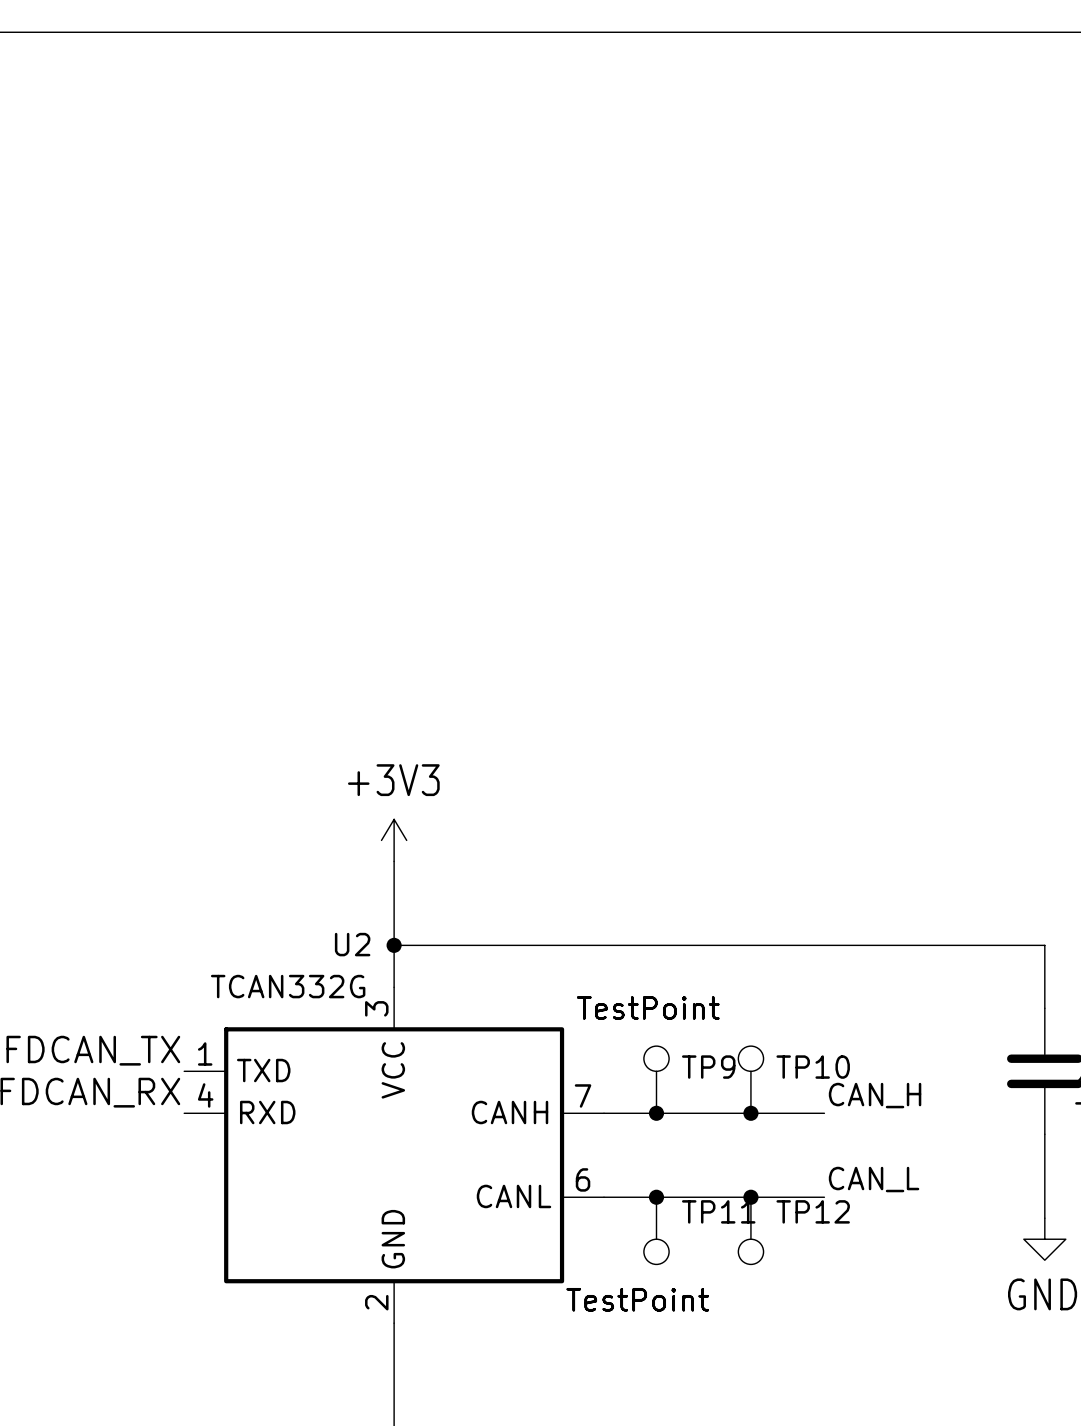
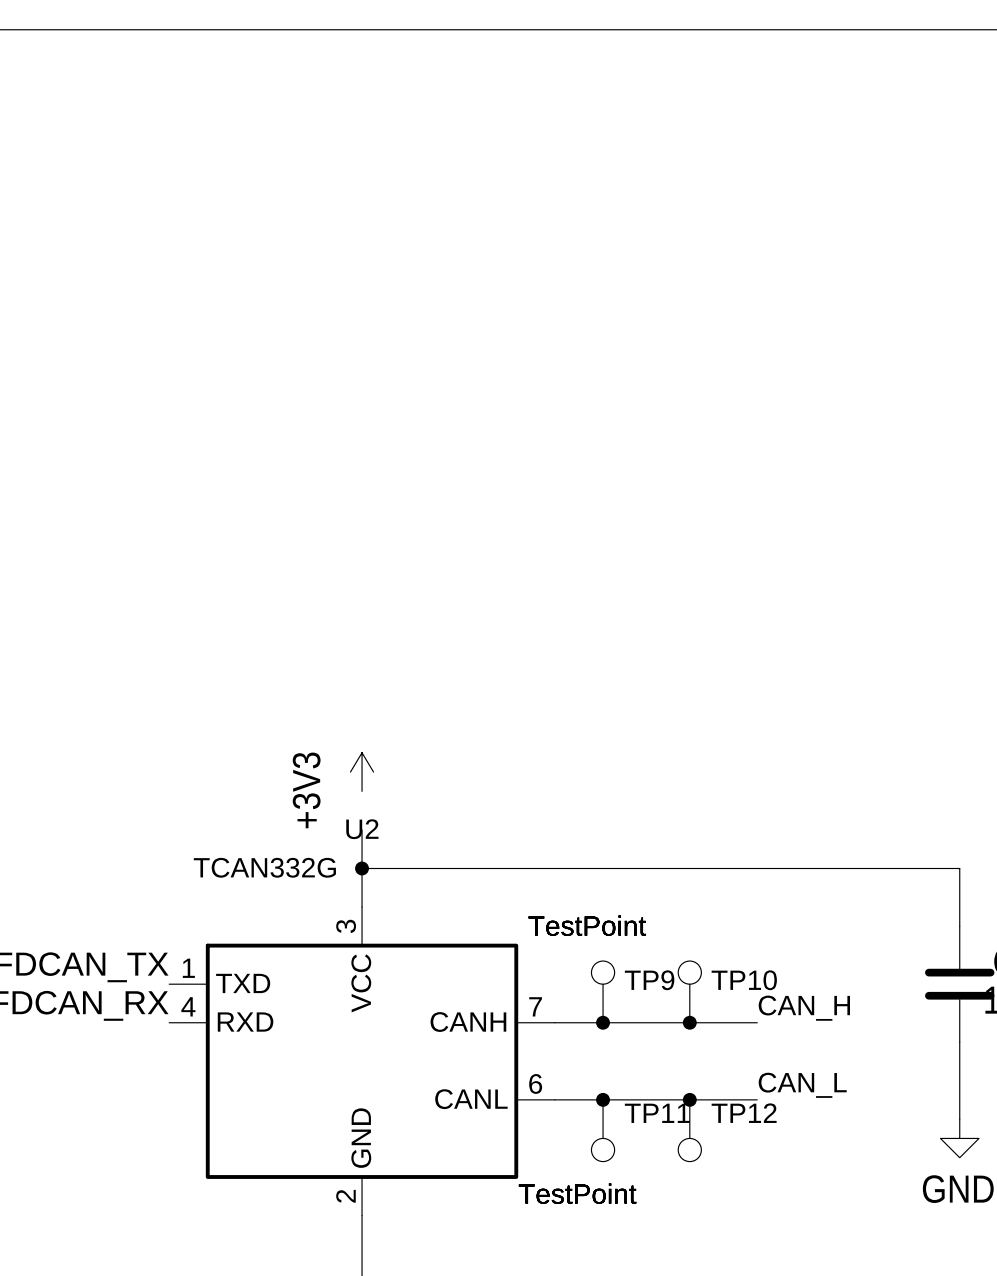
power symbol text rotation: 0° (393, 780) -> 90° counterclockwise (306, 790)
wire: (394, 861) (394, 903) -> none
U2 name position: U2 (352, 944) -> U2 (362, 829)
U2 value position: TCAN332G (288, 986) -> TCAN332G (264, 867)

